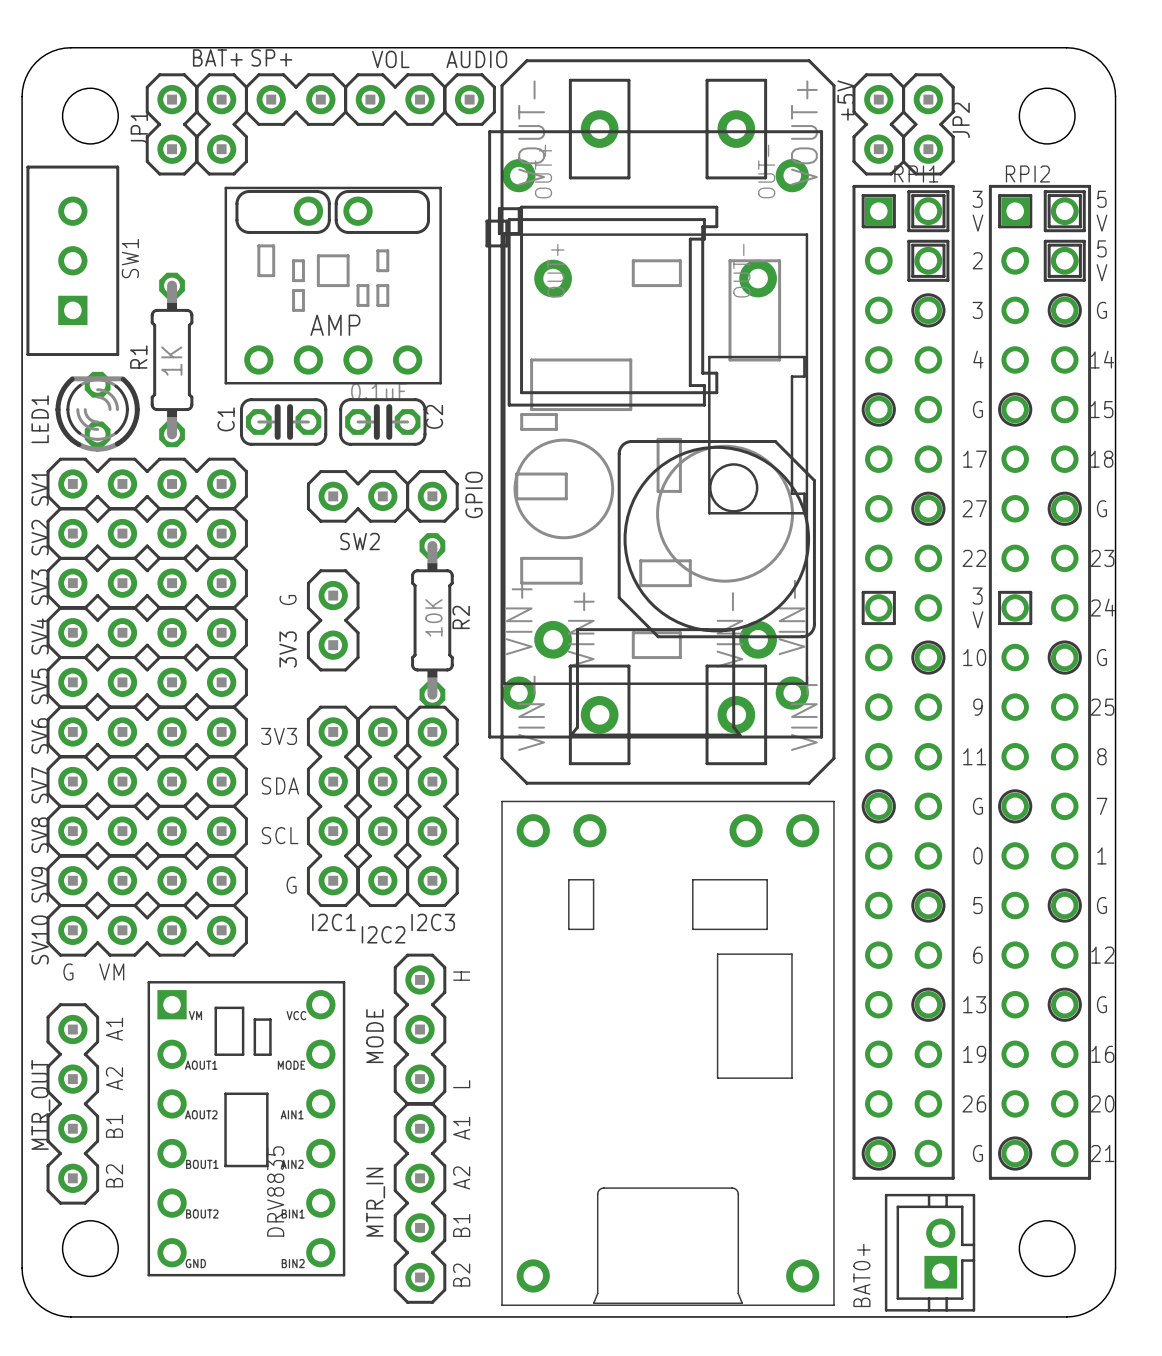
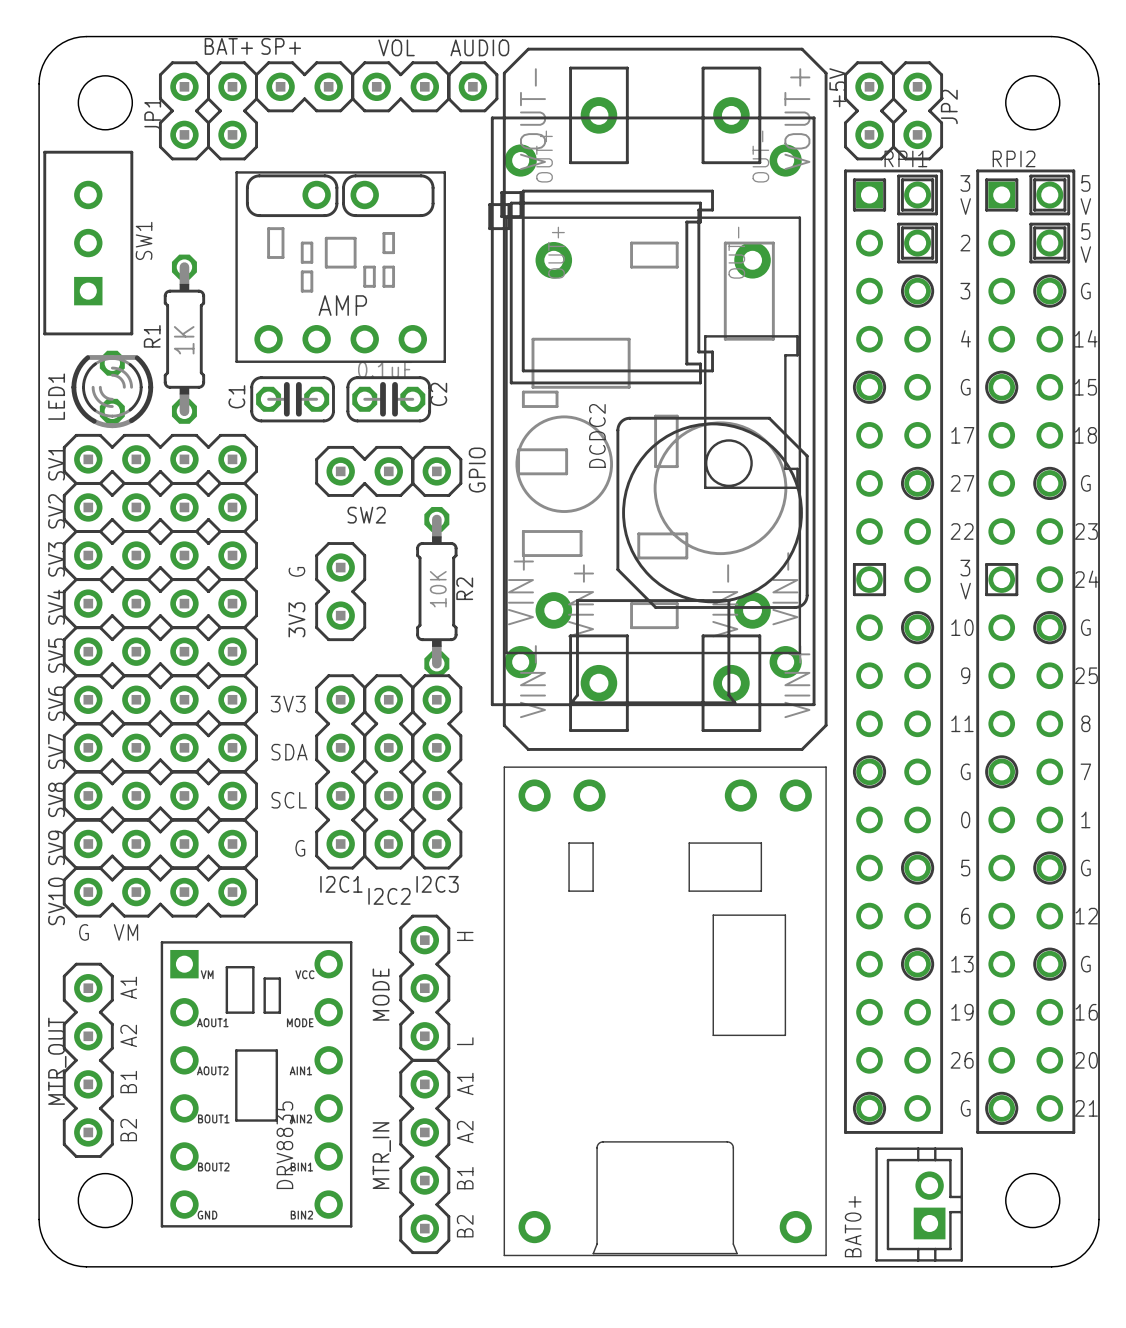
DCDC2 name: none -> DCDC2 (597, 435)

